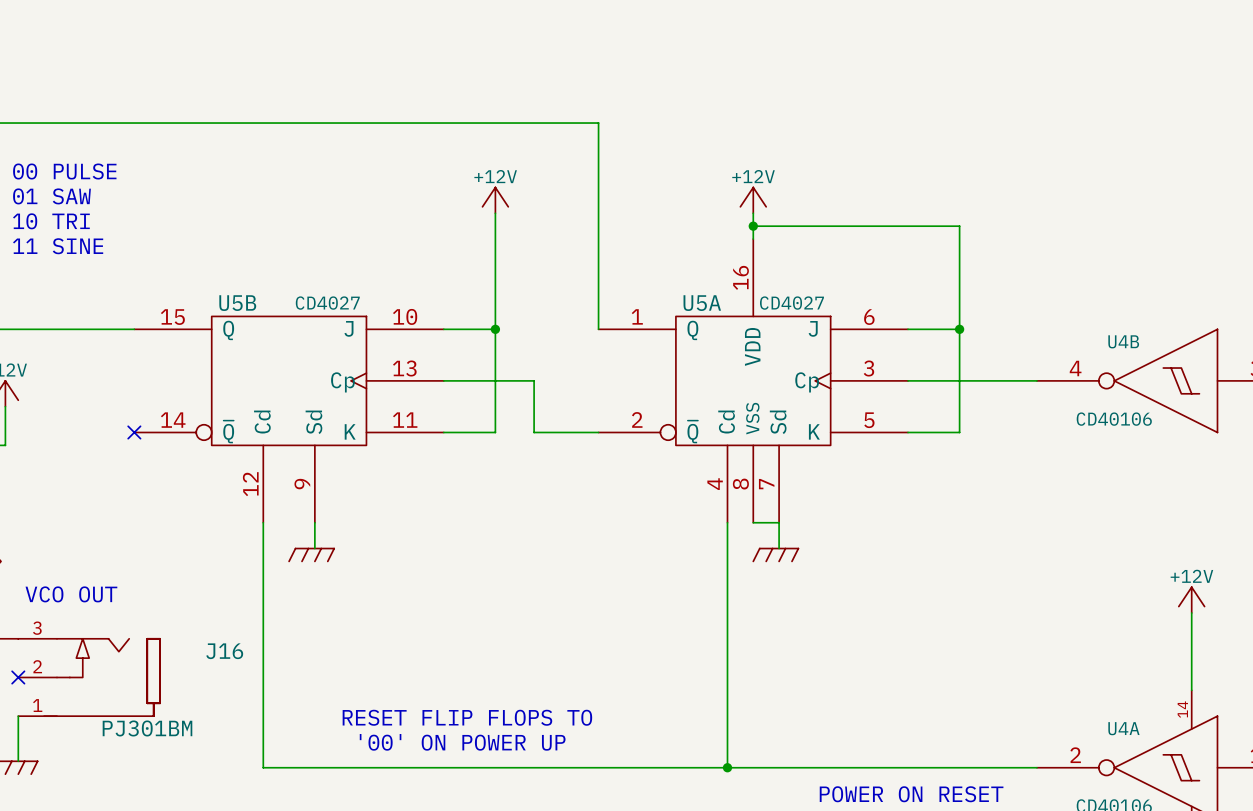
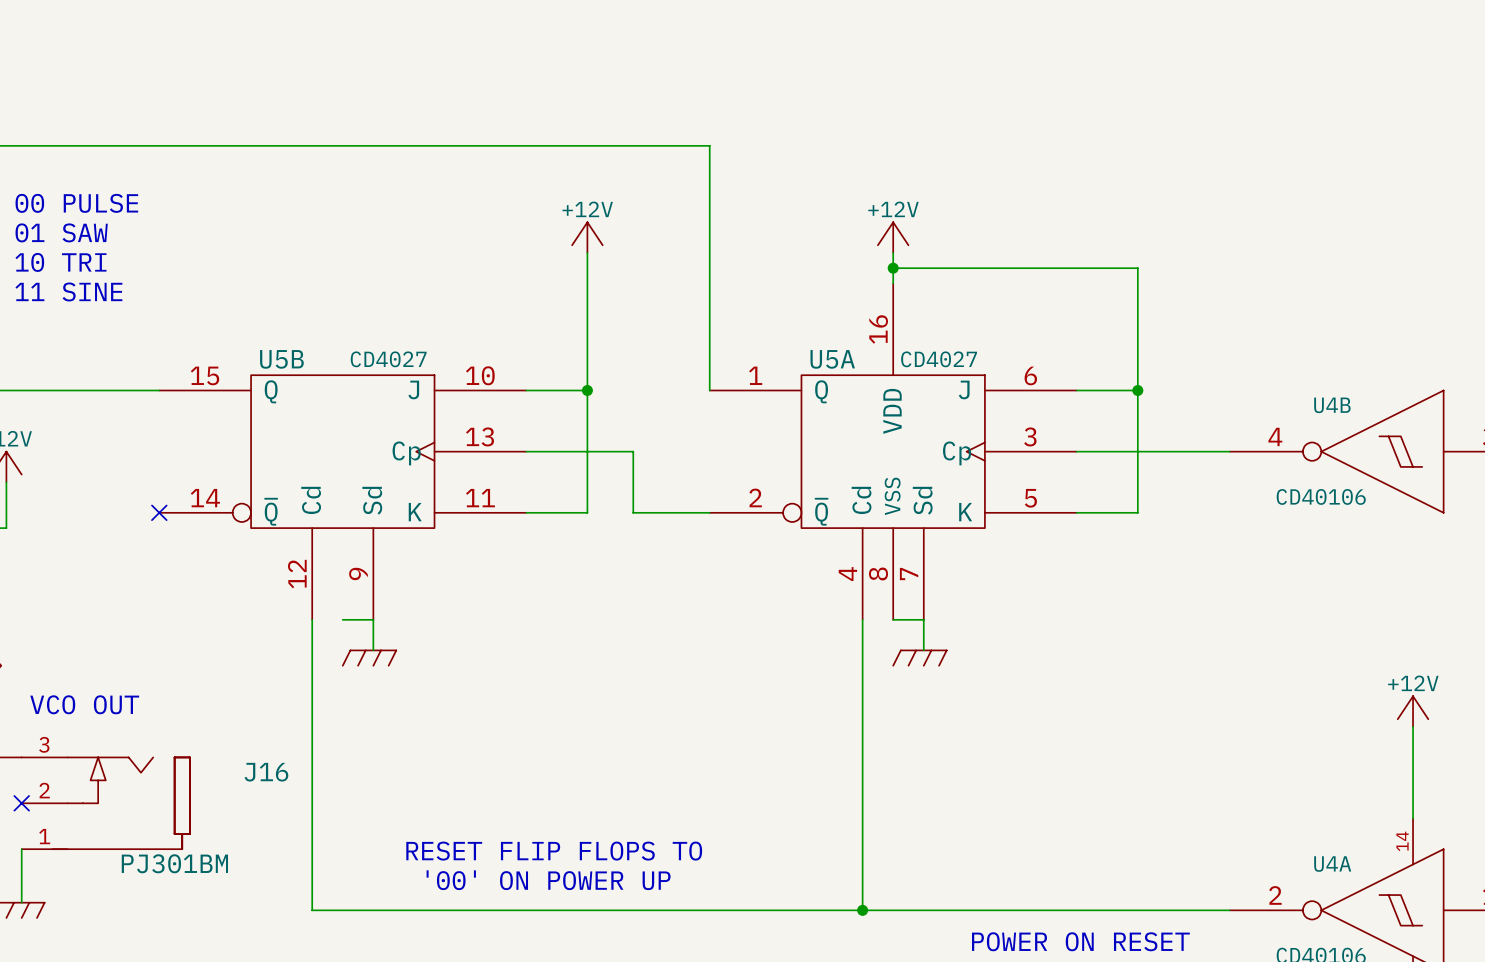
wire: none -> (342, 619) (373, 619)

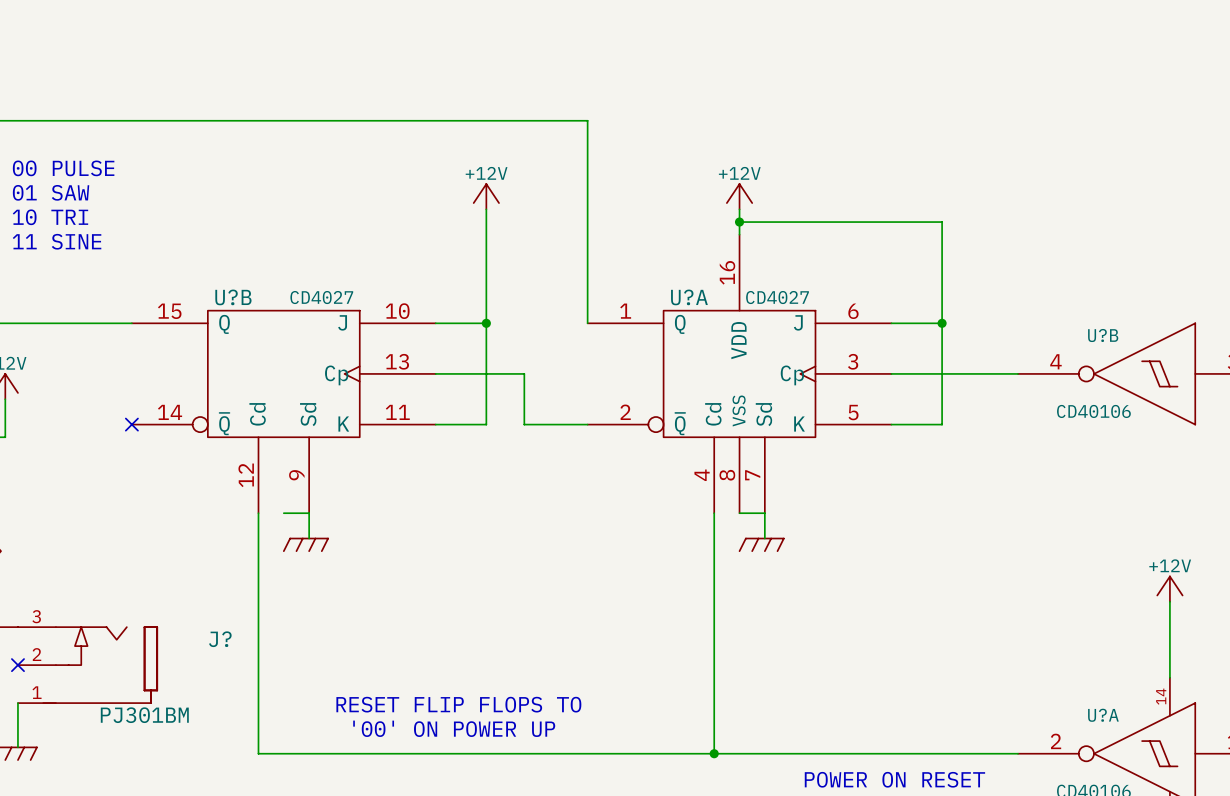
U5B name: U5B (281, 359) -> U?B (233, 297)
U5A name: U5A (832, 359) -> U?A (689, 297)
U4B name: U4B (1332, 405) -> U?B (1103, 335)
text: VCO OUT (84, 704) -> none
J16 name: J16 (266, 772) -> J? (220, 639)
U4A name: U4A (1332, 864) -> U?A (1103, 715)

